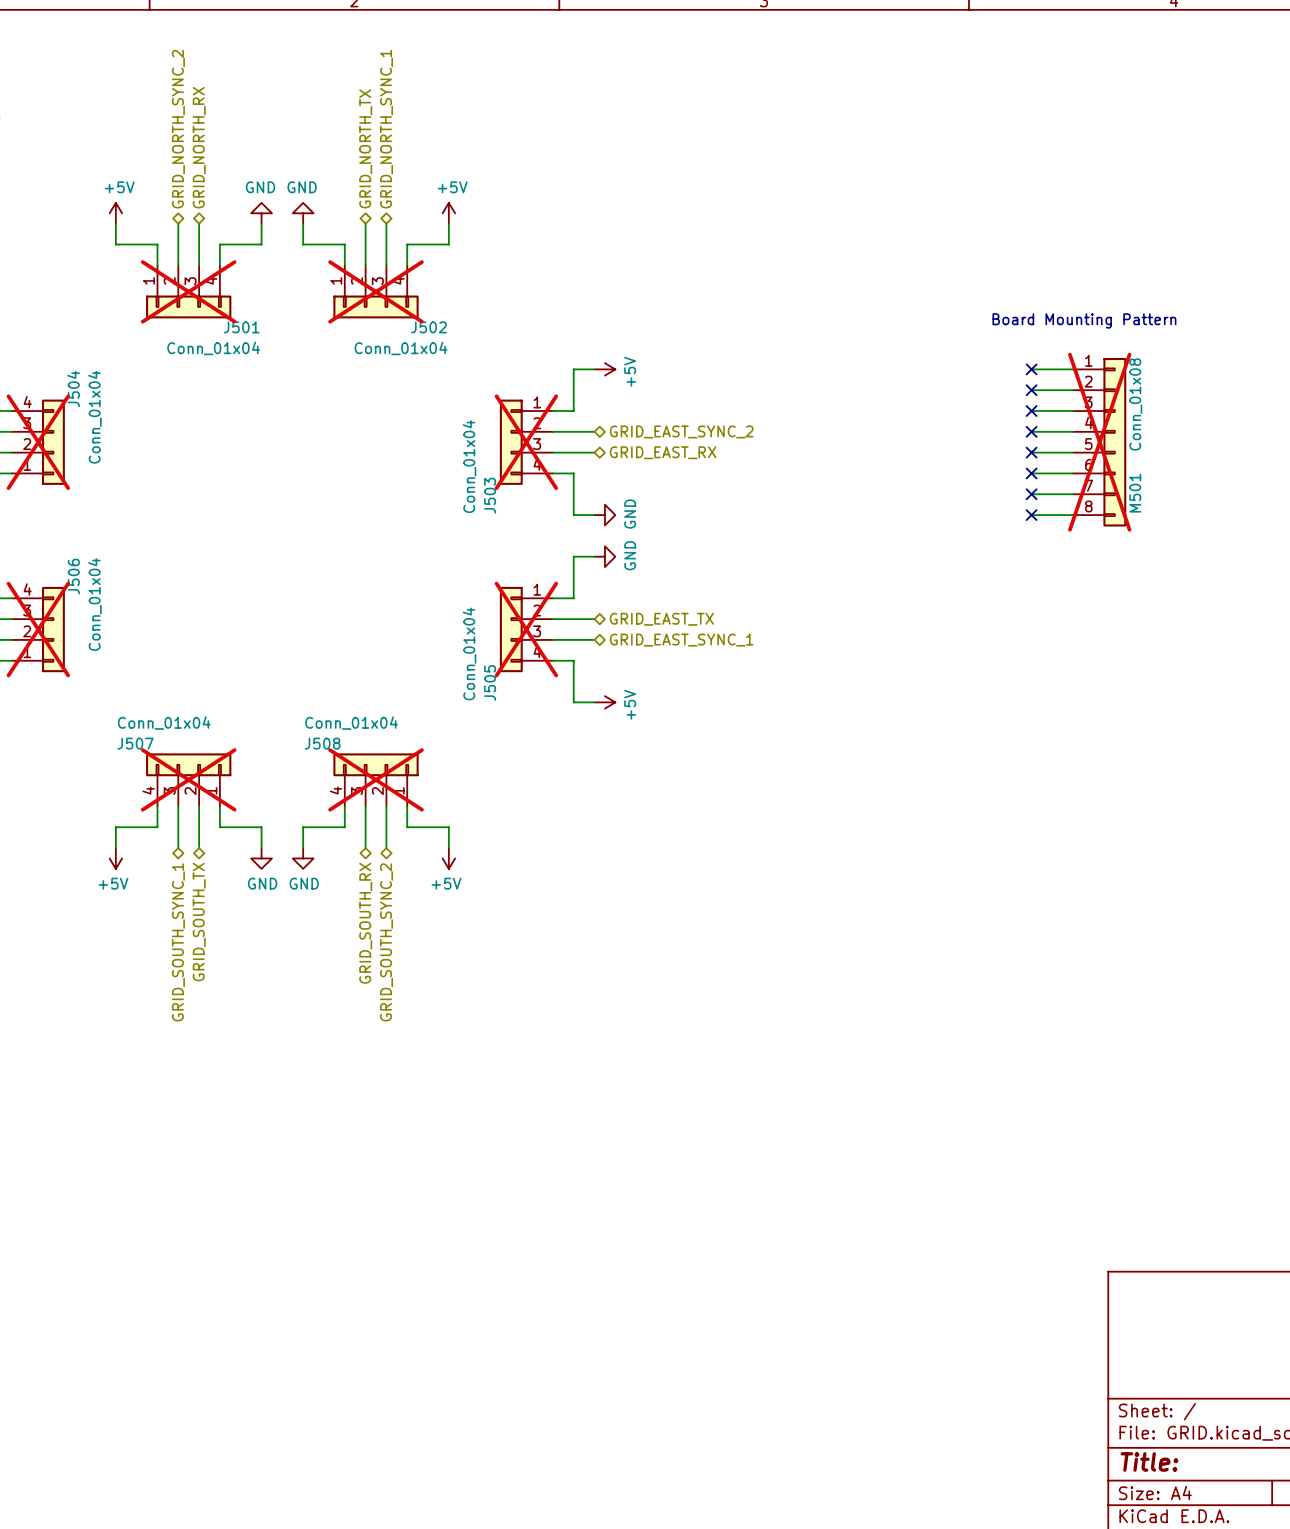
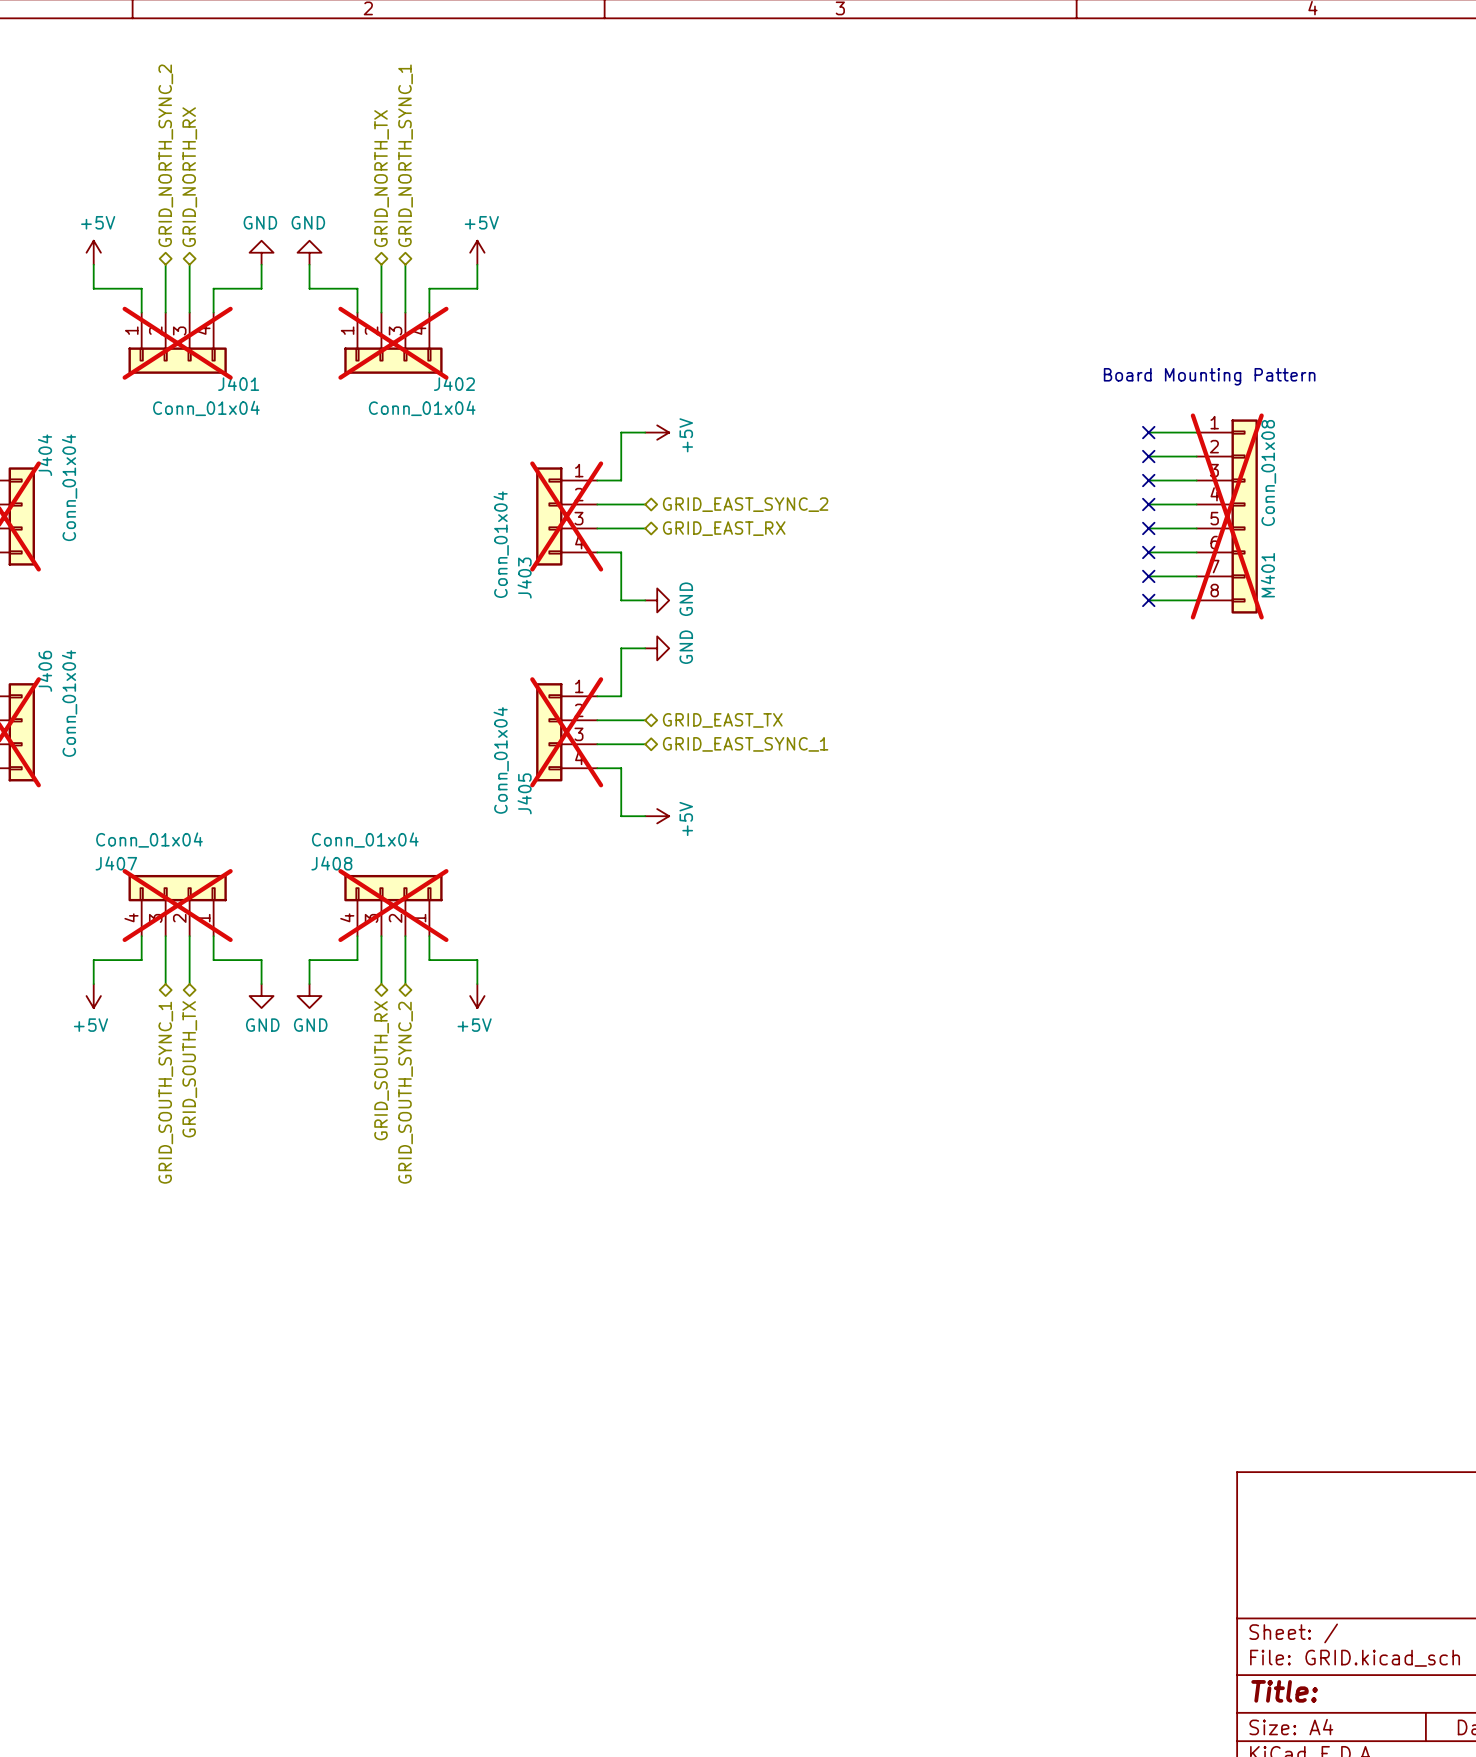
J501 name: J501 (241, 327) -> J401 (238, 383)
J502 name: J502 (428, 327) -> J402 (454, 383)
J504 name: J504 (73, 389) -> J404 (45, 455)
M501 name: M501 (1135, 493) -> M401 (1267, 575)
J503 name: J503 (490, 495) -> J403 (524, 578)
J506 name: J506 (73, 576) -> J406 (45, 671)
J505 name: J505 (490, 682) -> J405 (524, 793)
J507 name: J507 (135, 743) -> J407 (116, 863)
J508 name: J508 (322, 743) -> J408 (331, 863)

